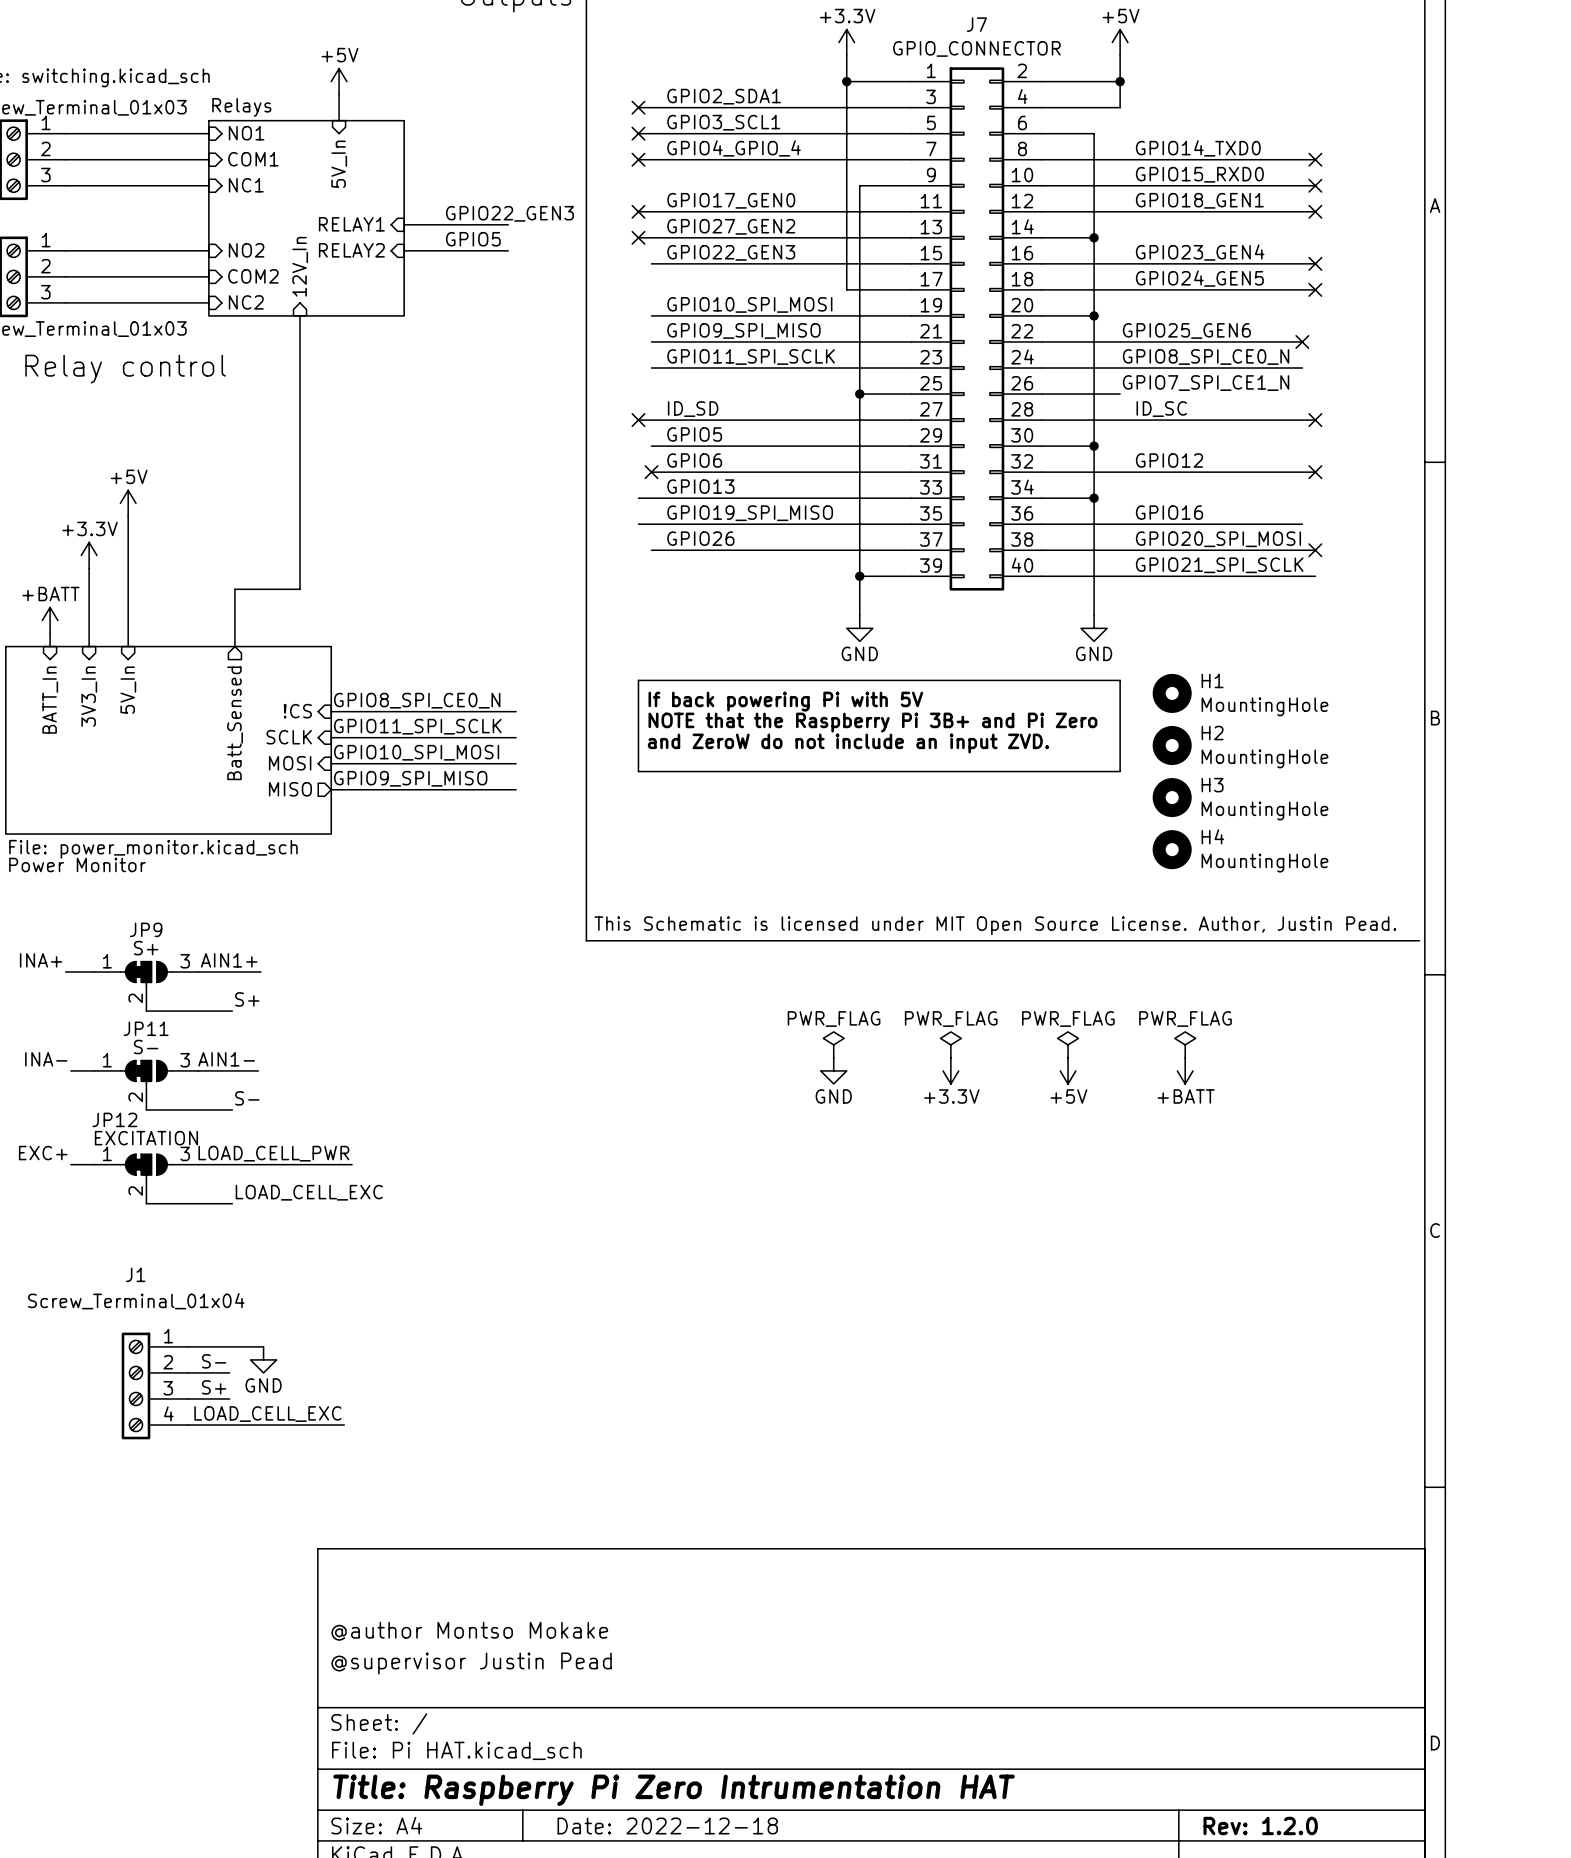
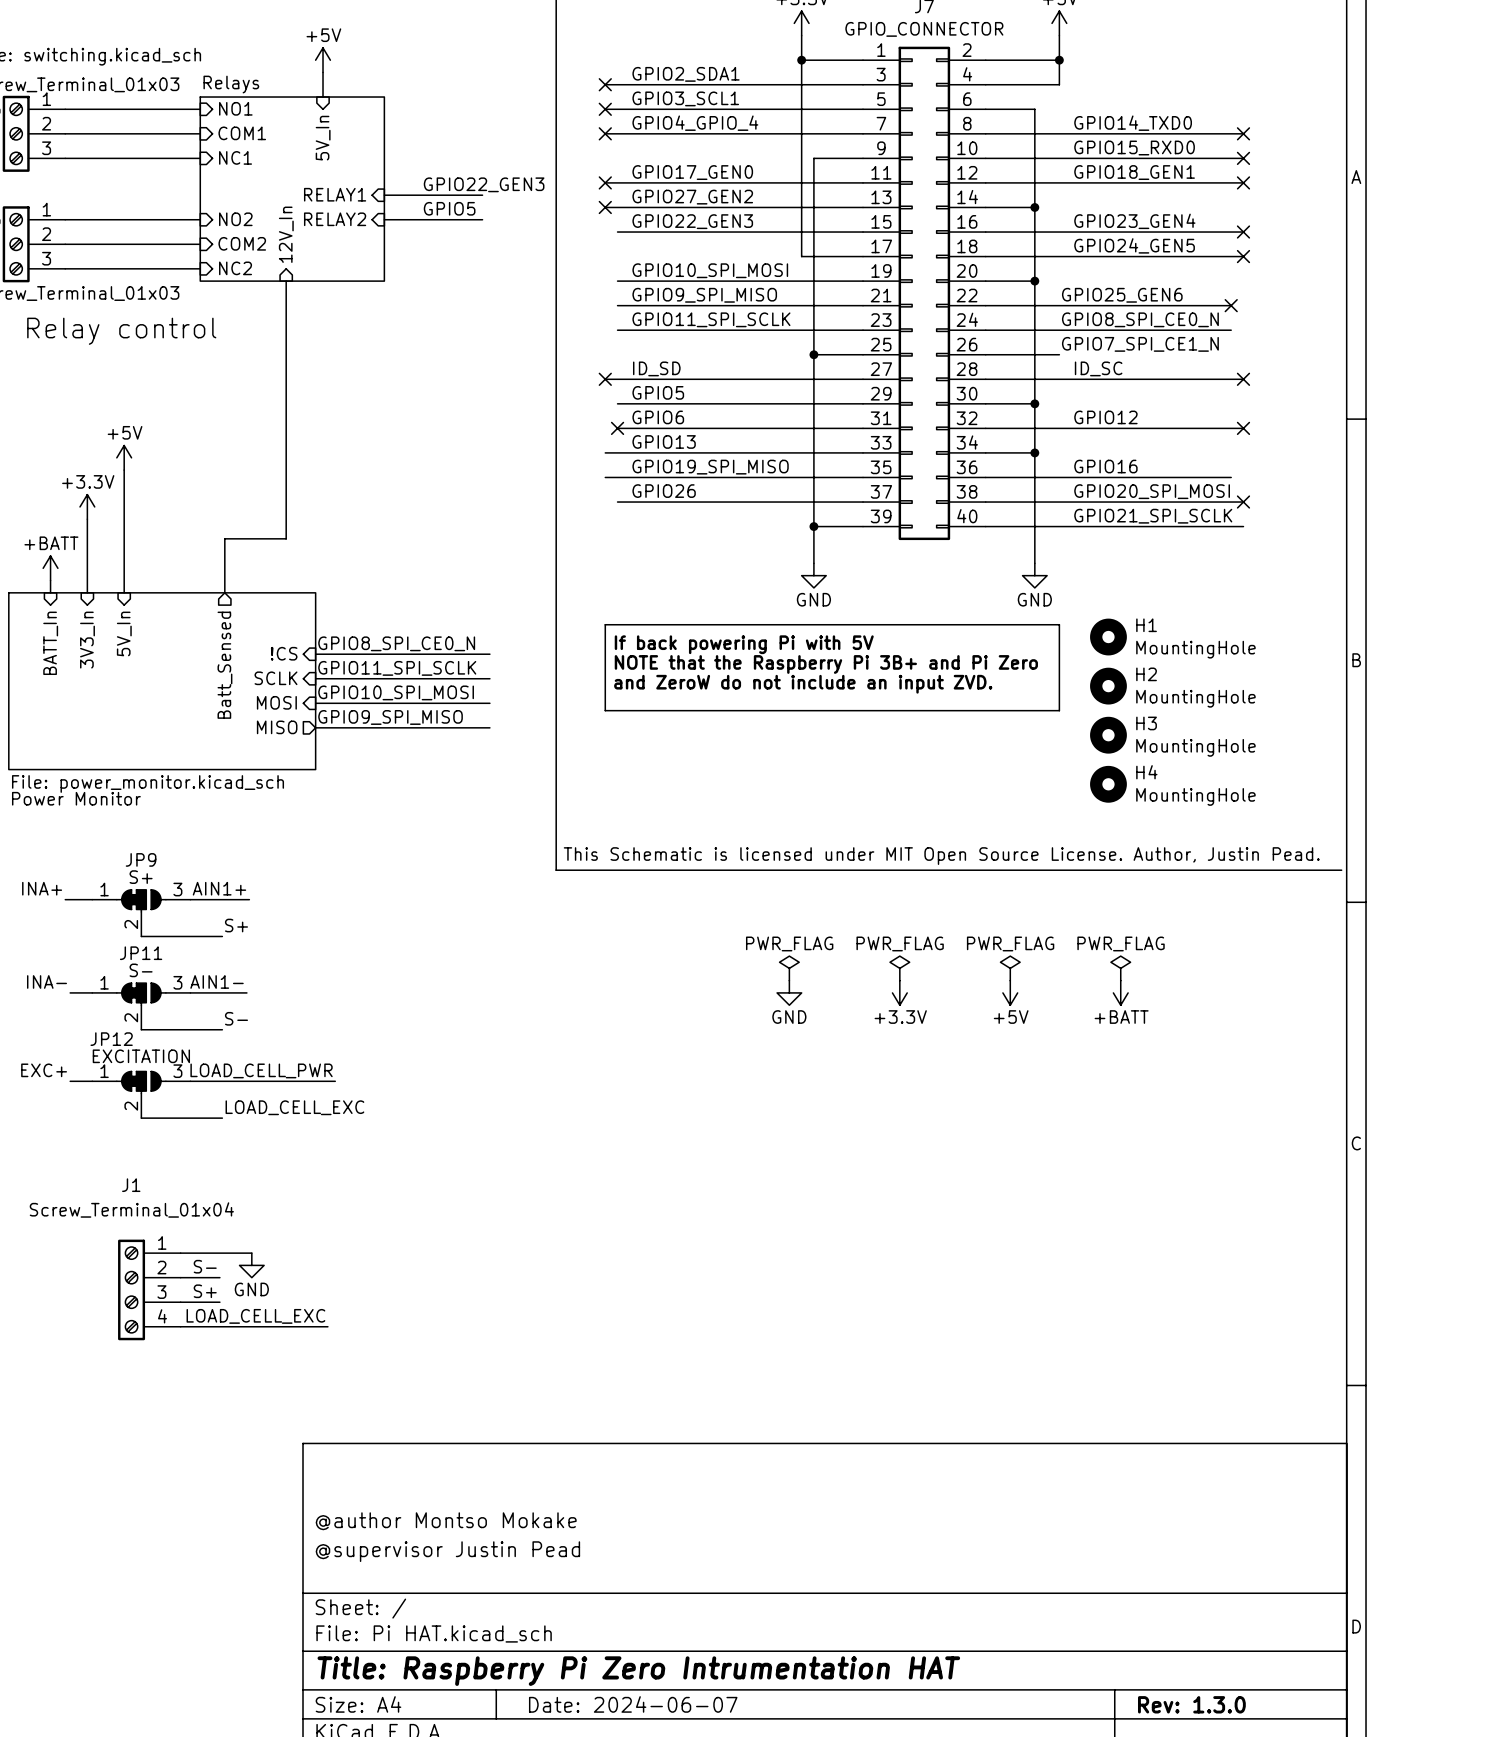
title block: Date: 2022-12-18 (667, 1825) -> Date: 2024-06-07 (633, 1704)
title block: Rev: 1.2.0 (1260, 1825) -> Rev: 1.3.0 (1191, 1704)

